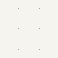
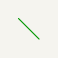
wire: none -> (18, 18) (39, 39)

